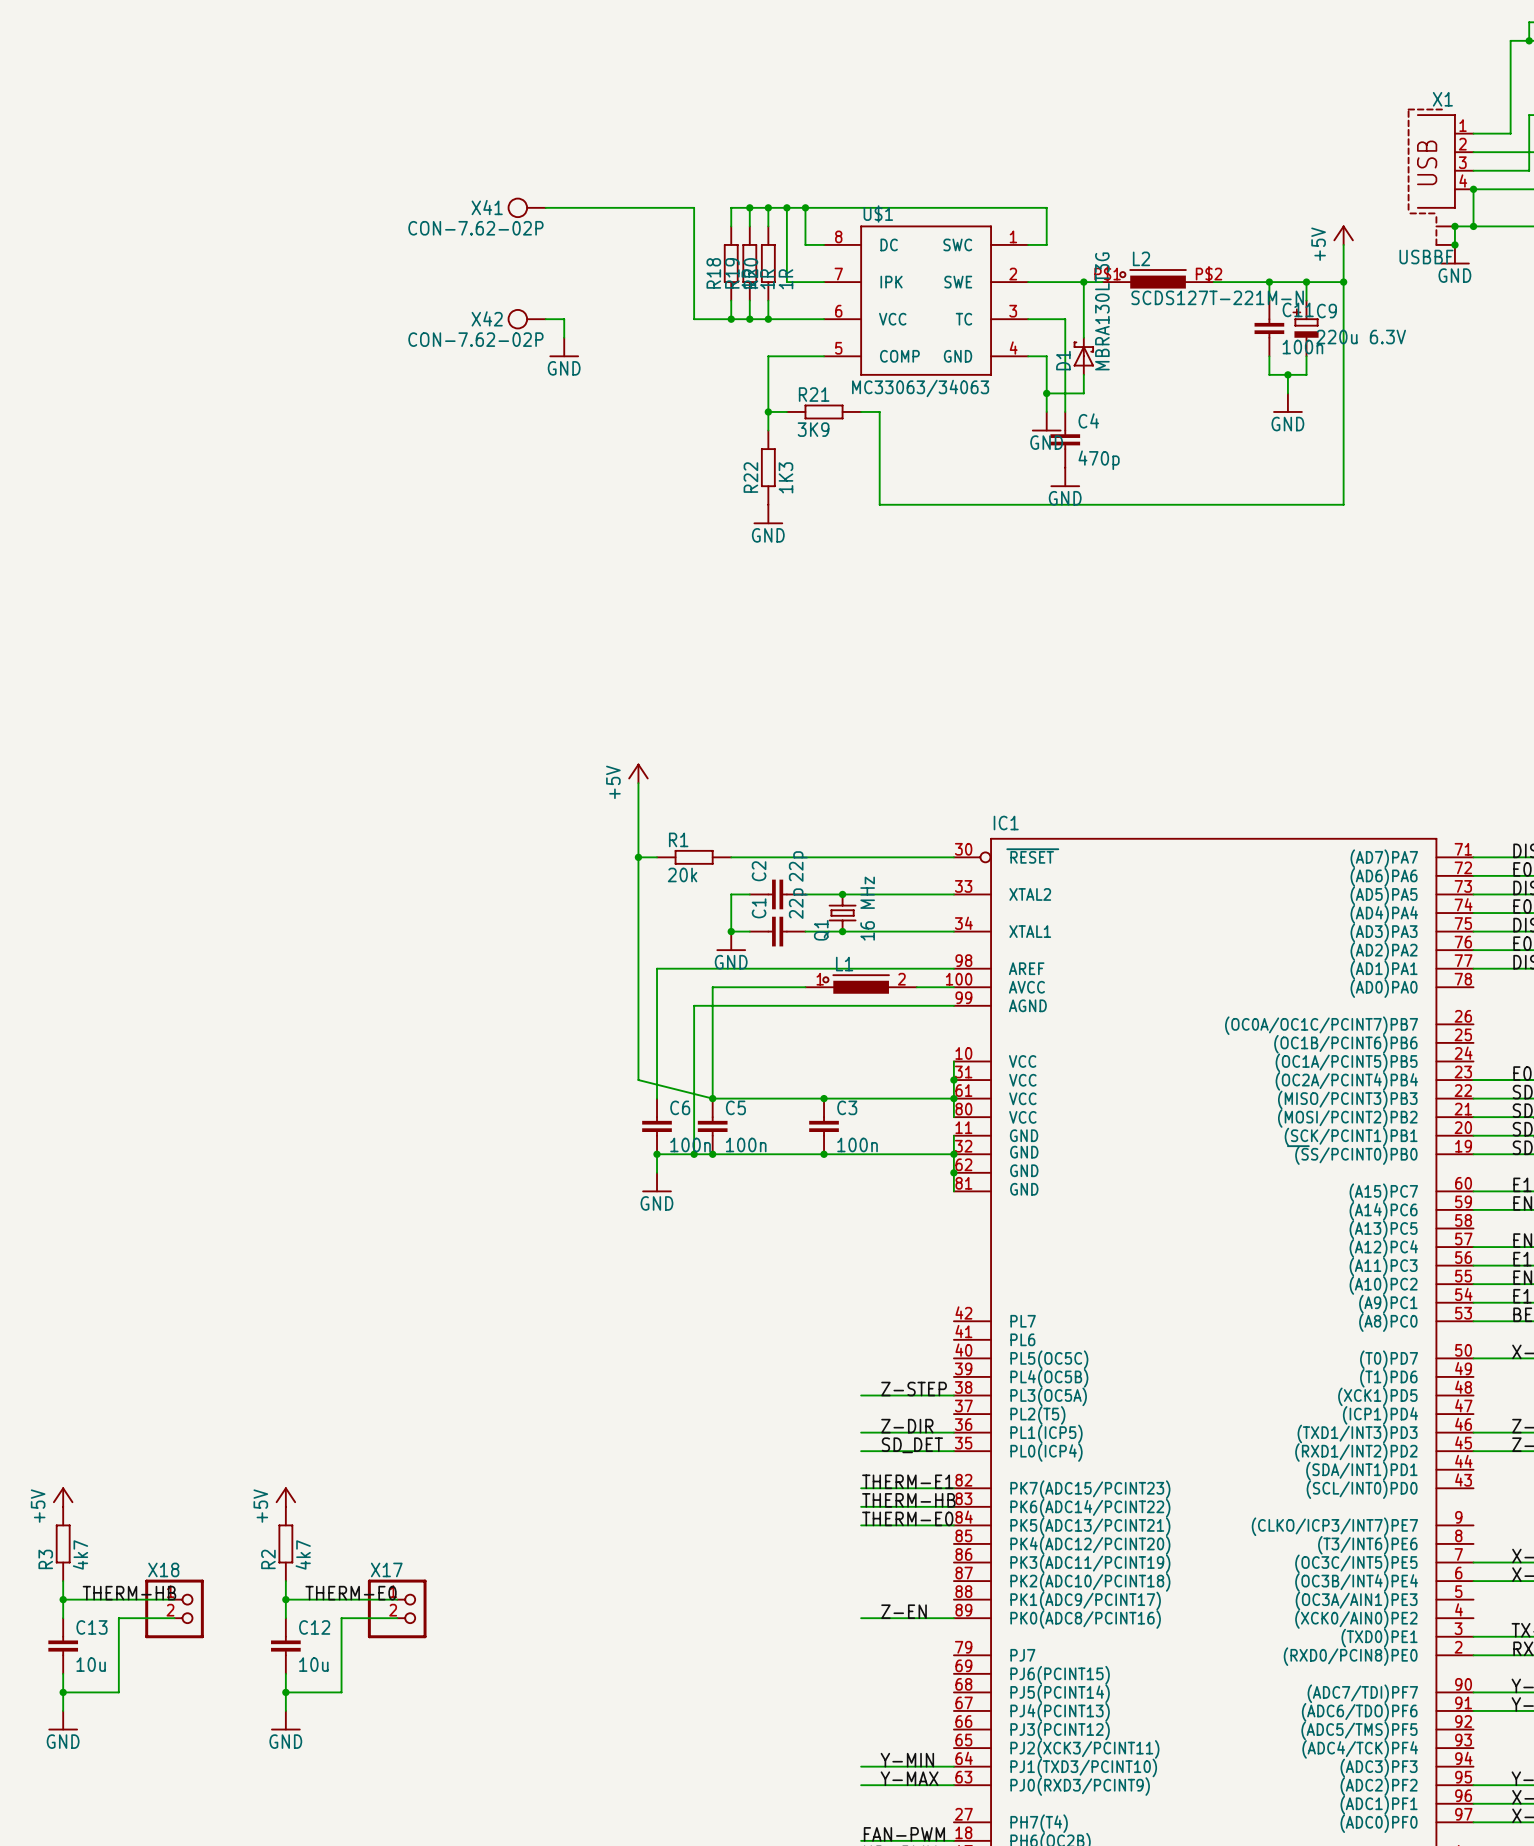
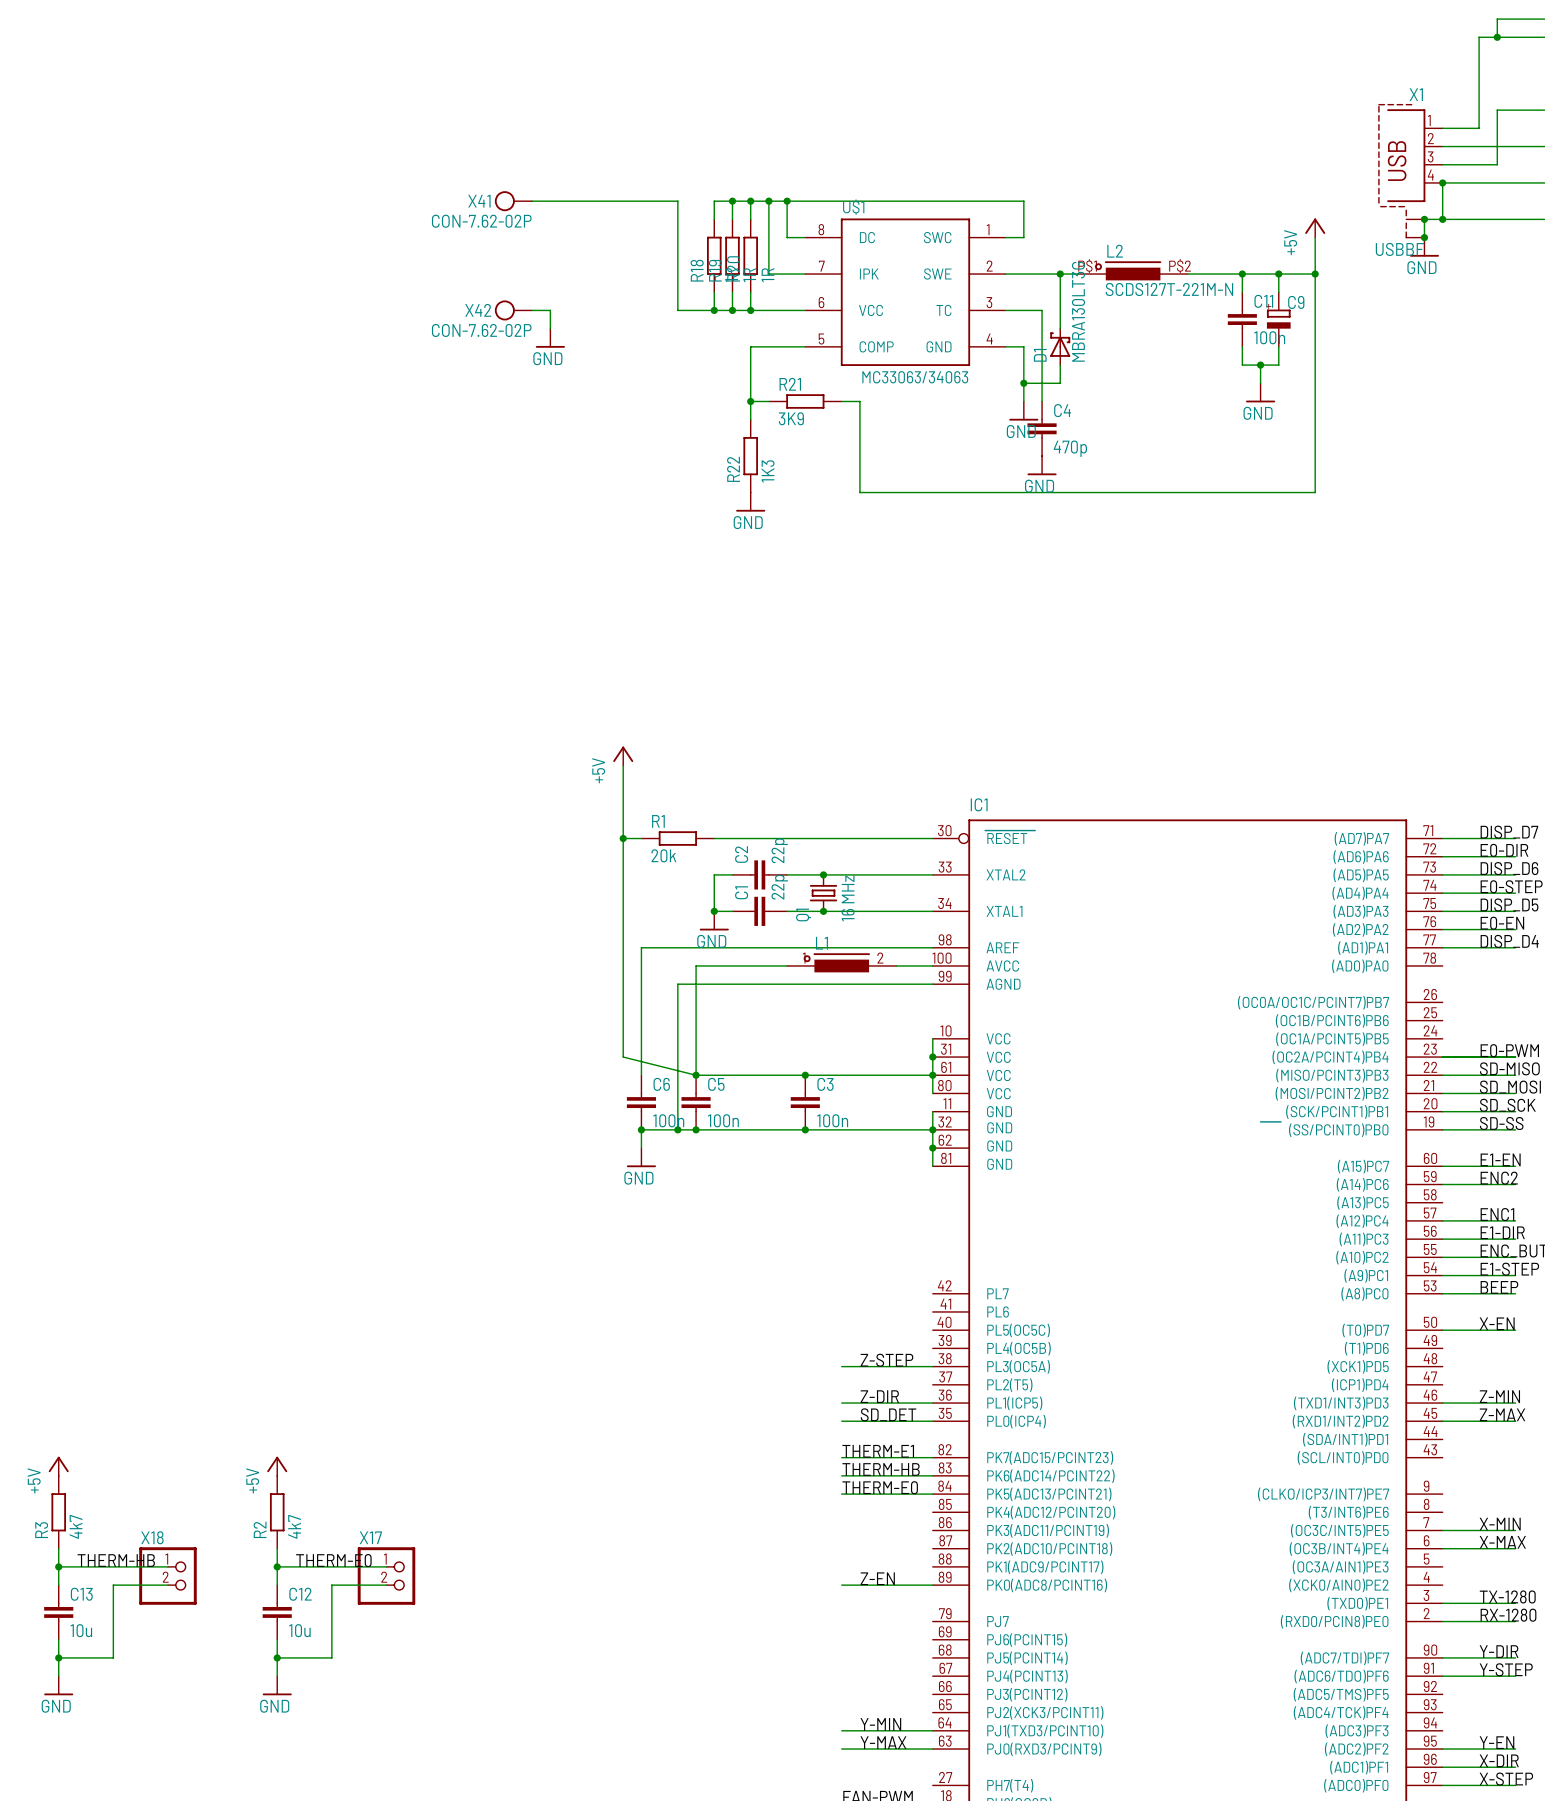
C9 value: 220u 6.3V (1361, 337) -> none

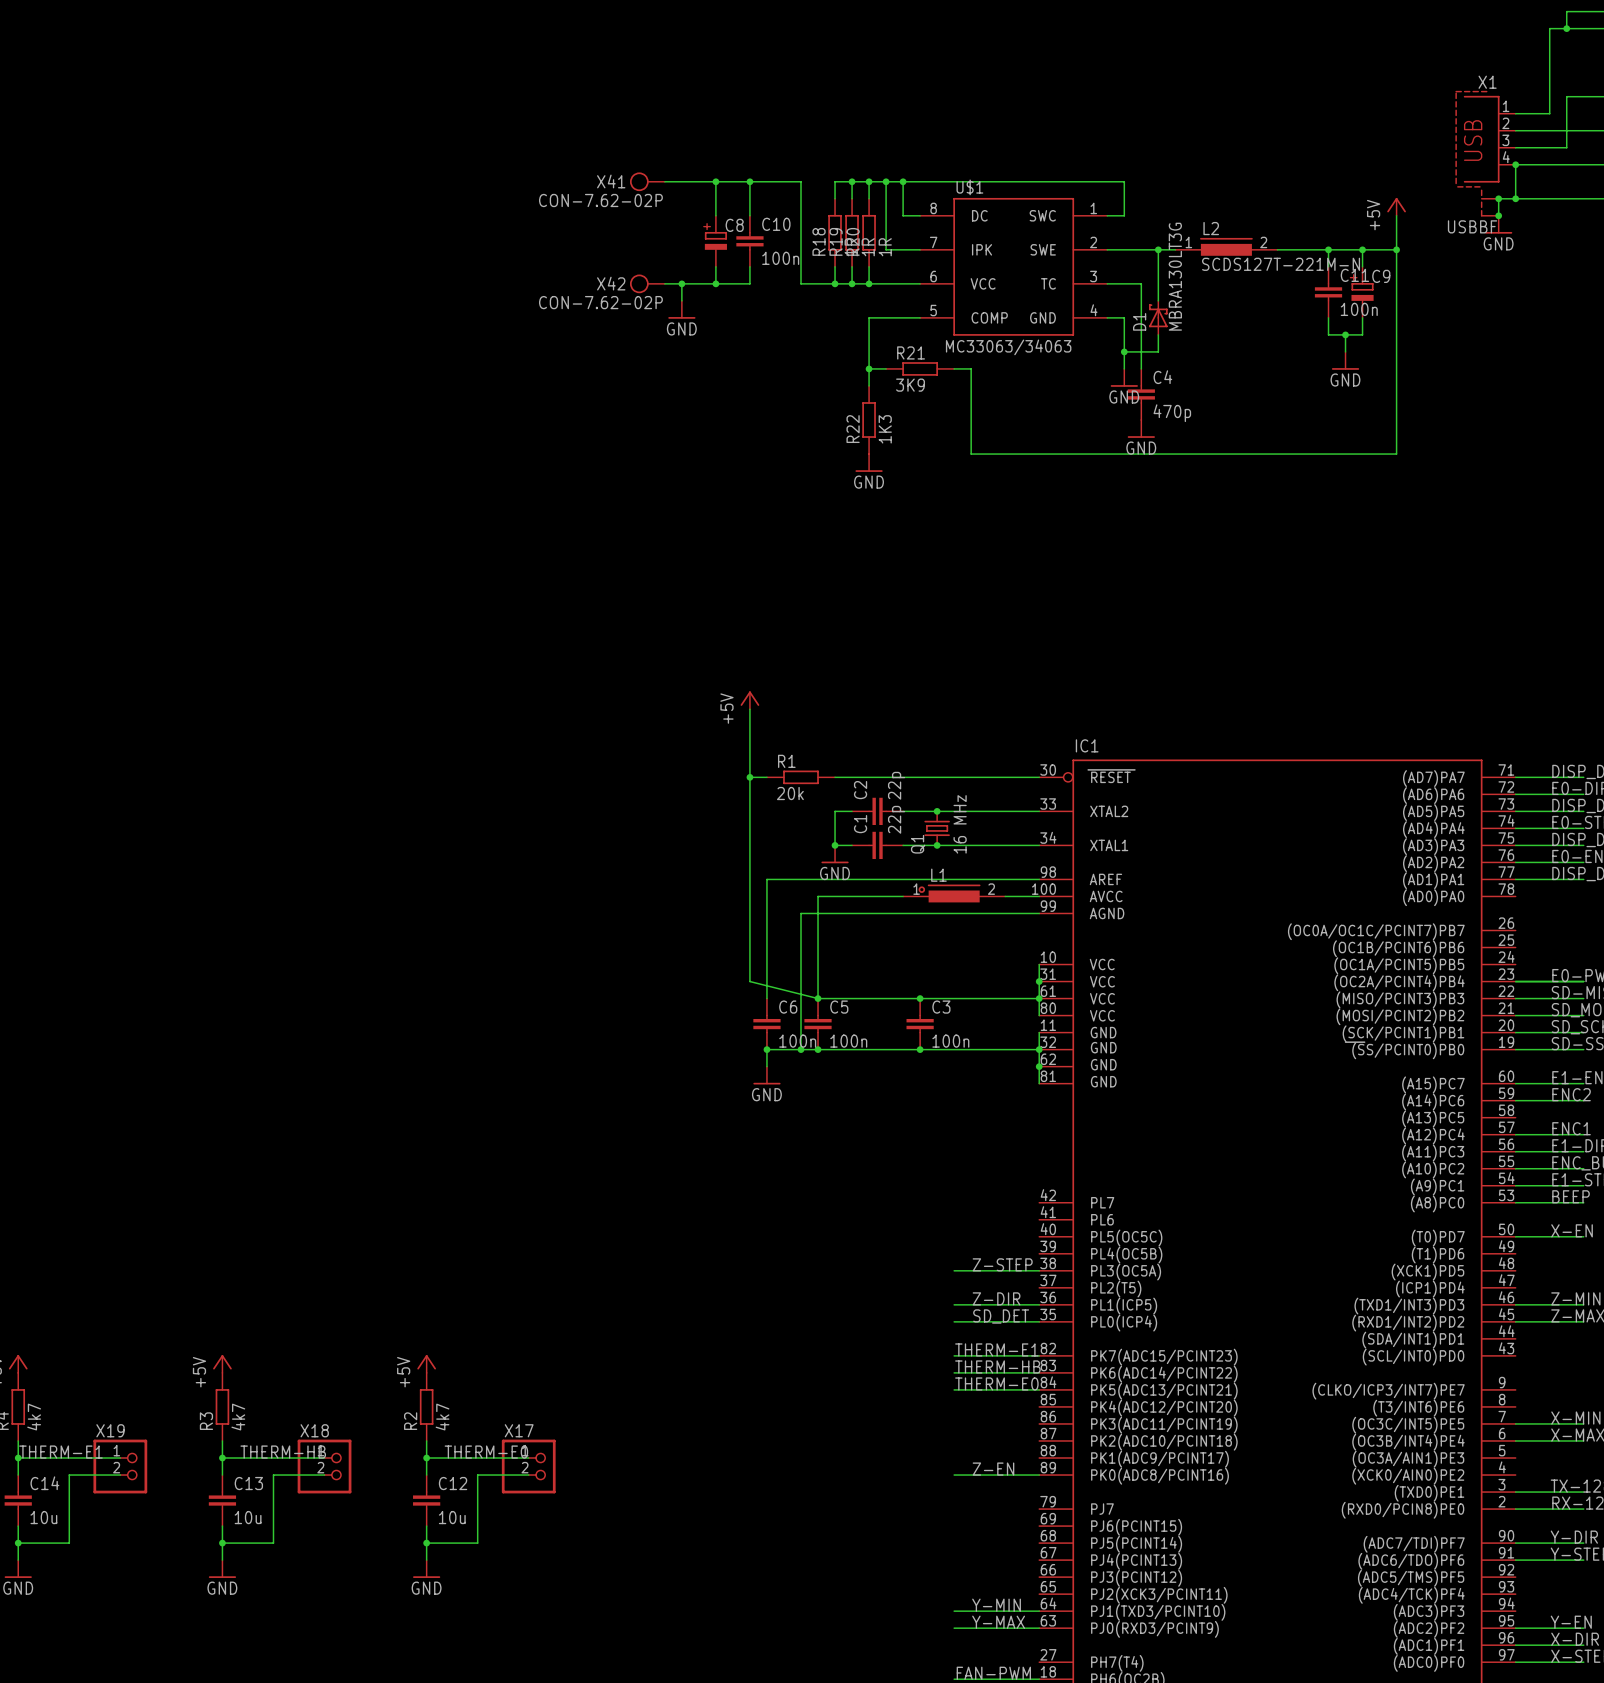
wire: none -> (715, 181) (715, 215)
junction: none -> (715, 181)
wire: none -> (749, 181) (749, 215)
junction: none -> (749, 181)
L2 symbol: [1078, 261, 1188, 281] -> [1175, 237, 1278, 256]
C8: none -> (715, 241)
C10: none -> 100n (749, 241)
wire: none -> (715, 266) (715, 283)
wire: none -> (749, 266) (749, 283) (681, 283)
junction: none -> (681, 283)
junction: none -> (715, 283)

